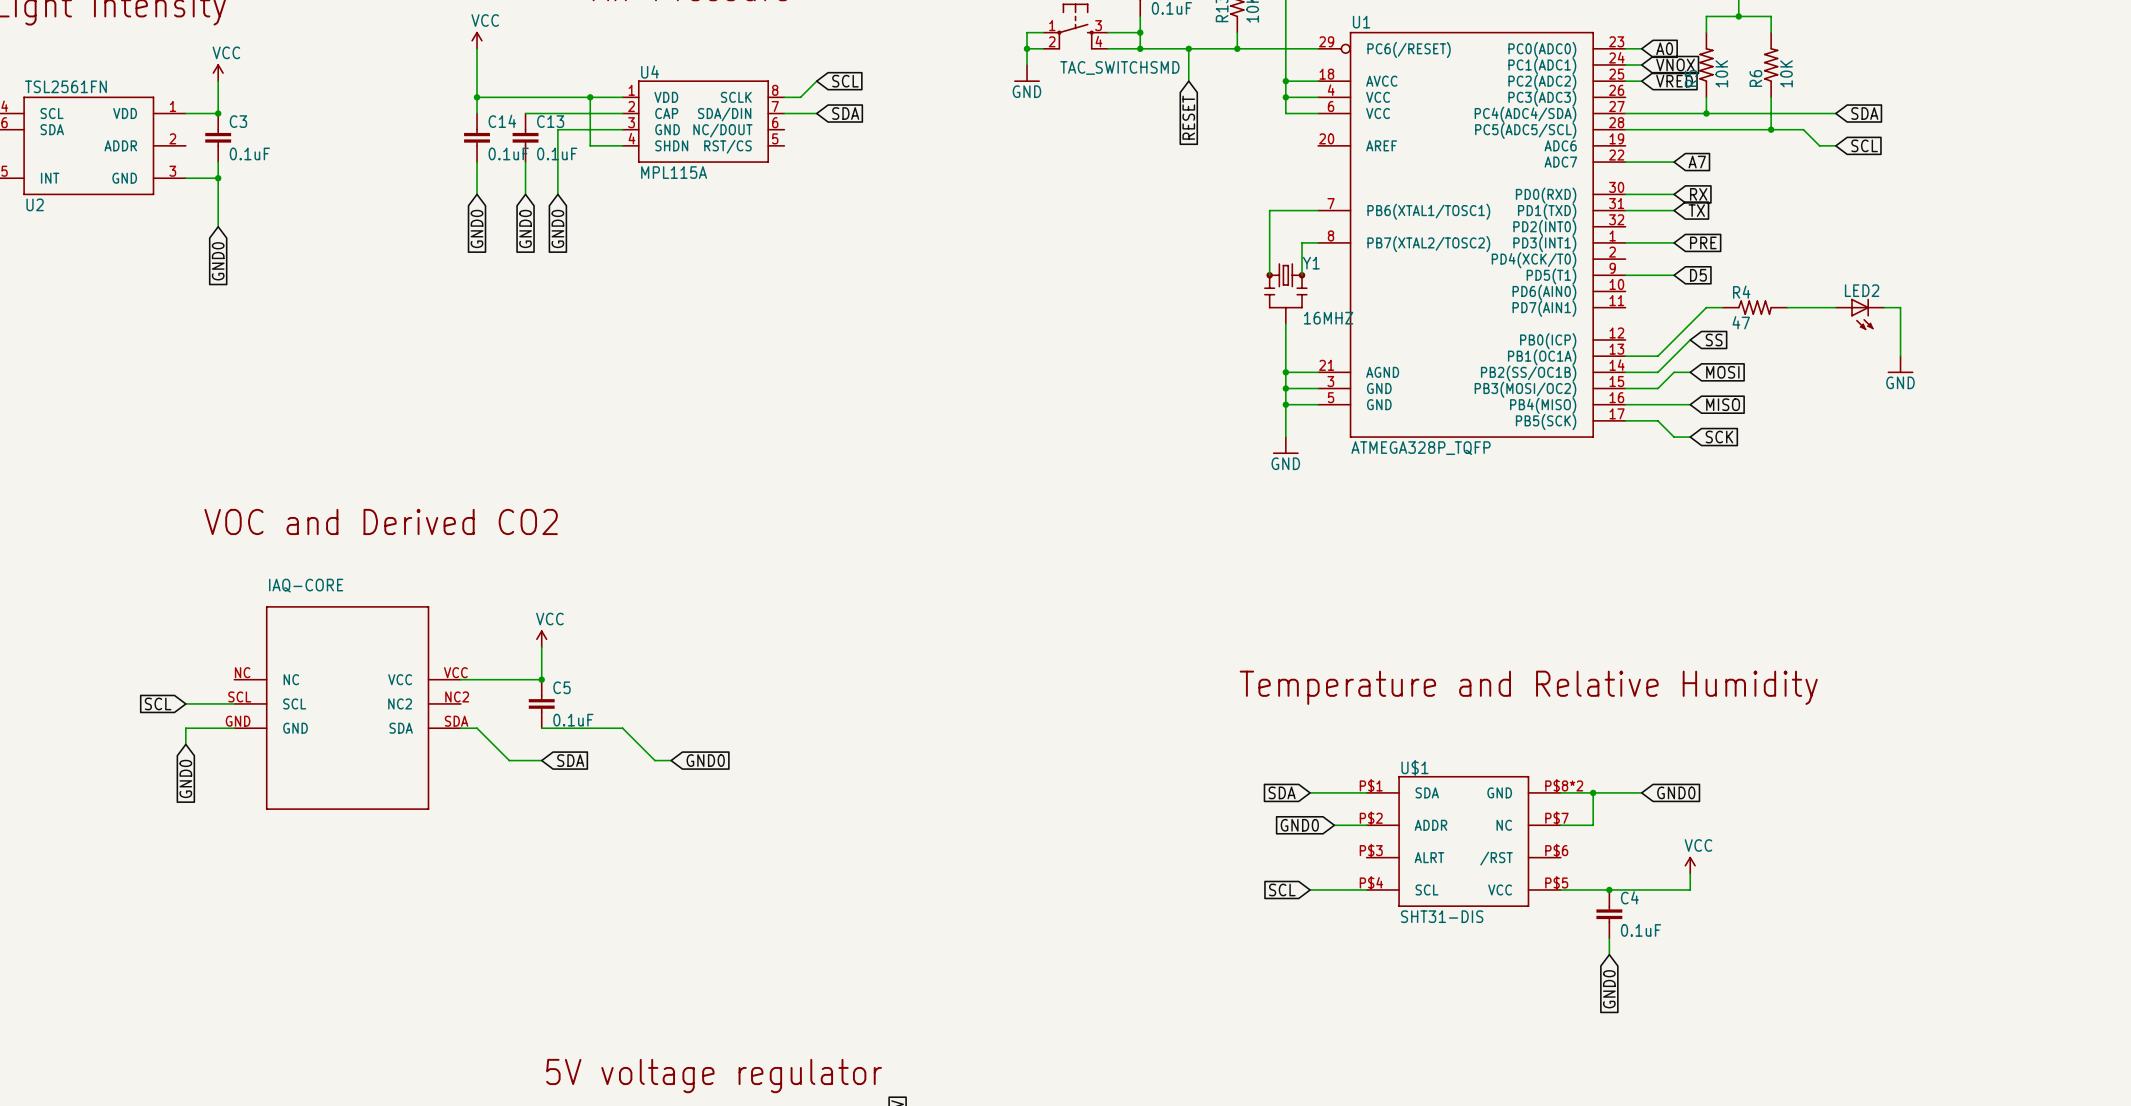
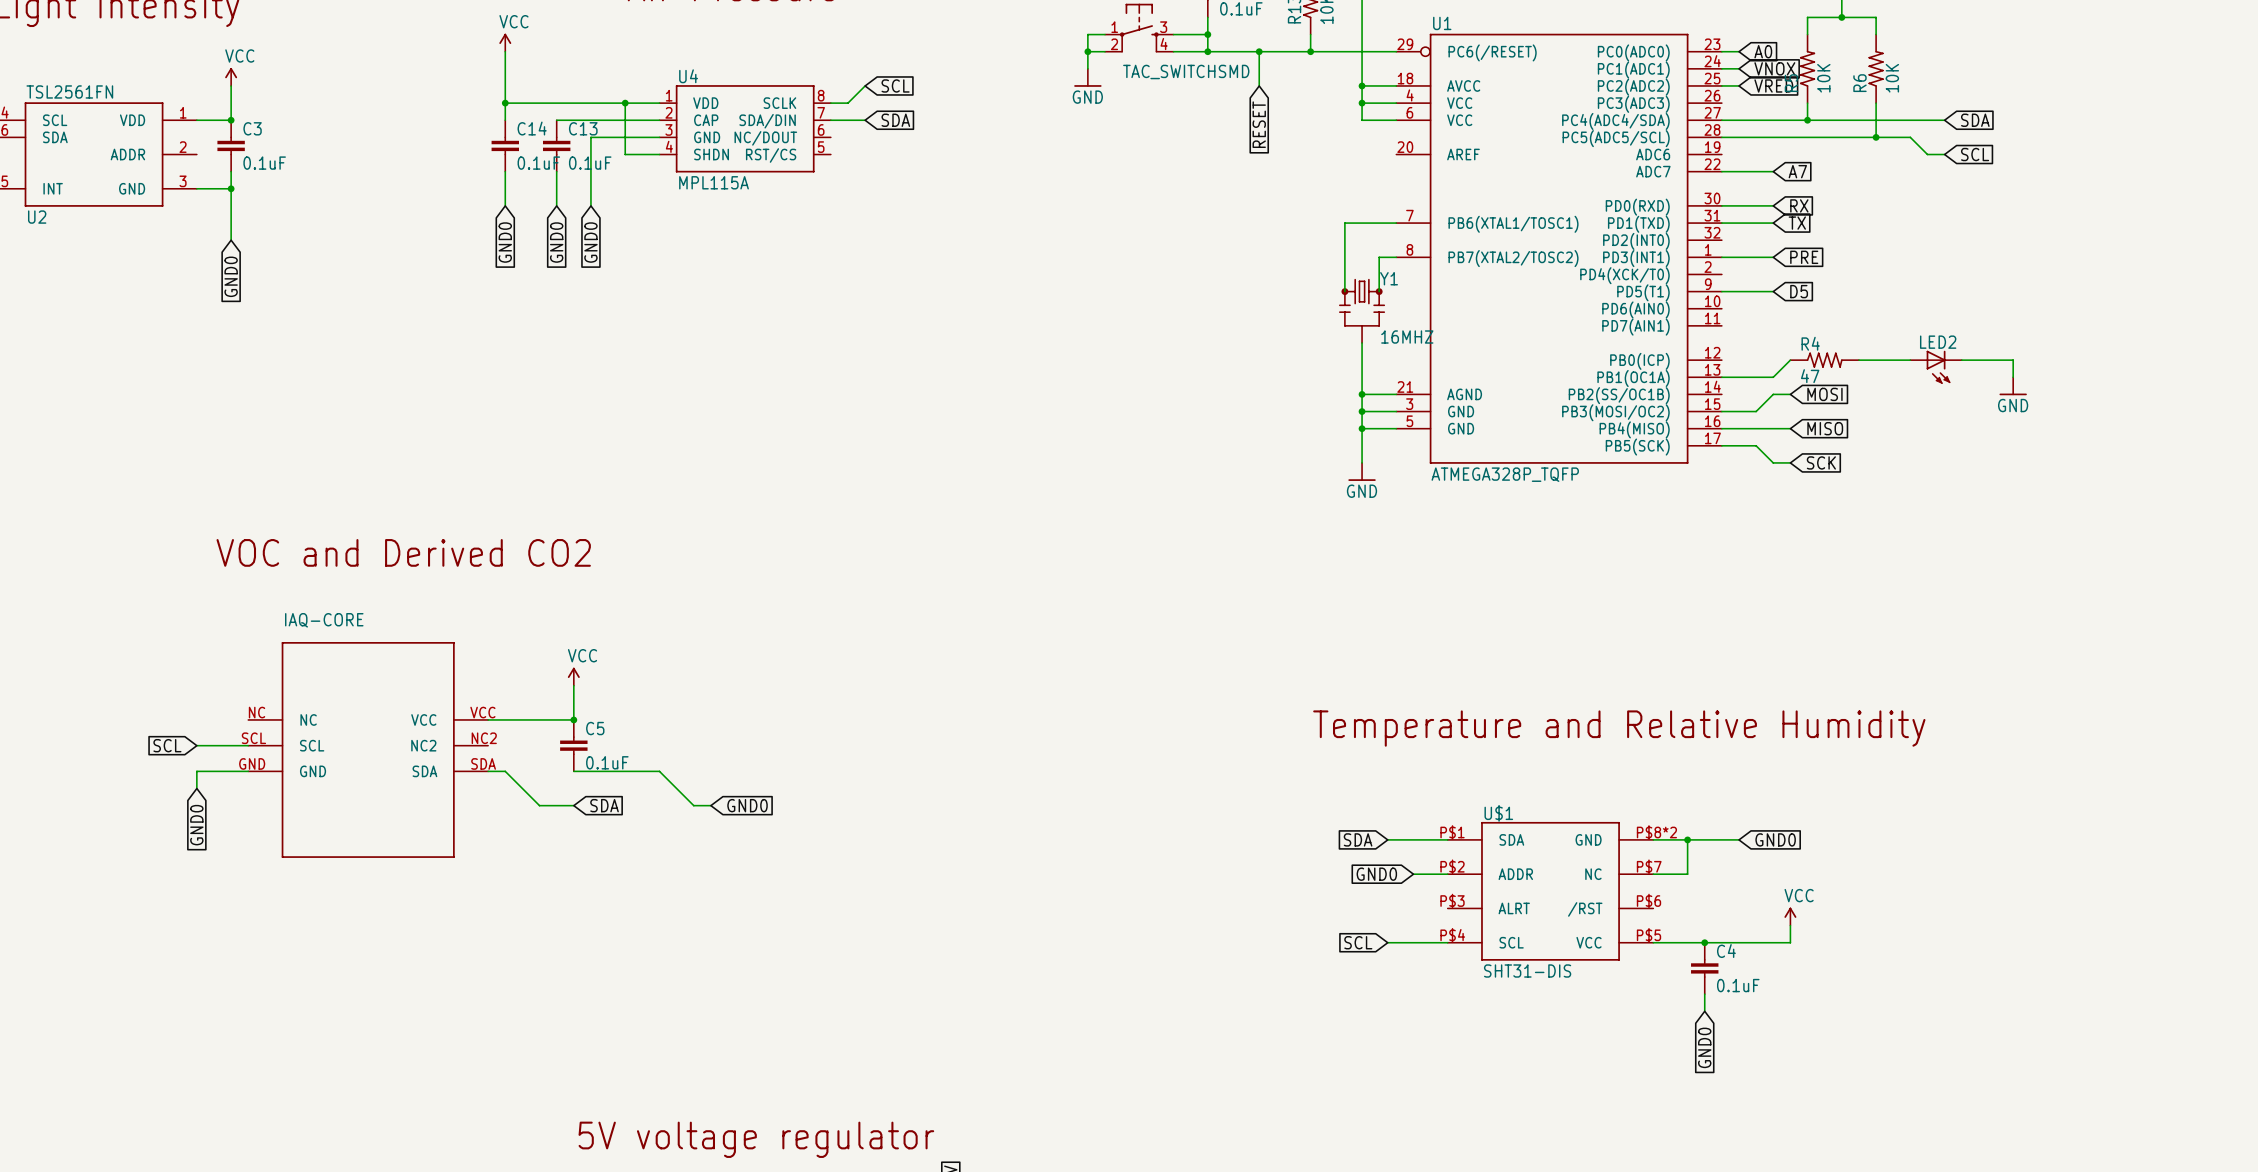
wire: (1722, 307) (1706, 307) (1657, 356) -> none
R4 position: (1754, 307) -> (1824, 360)
wire: (1787, 307) (1835, 307) -> (1858, 360) (1910, 360)
wire: (1884, 307) (1900, 307) (1900, 339) -> (1961, 360) (2013, 360)
LED2 position: (1860, 314) -> (1936, 367)
global label: SS (1714, 339) -> none
wire: (1674, 356) (1657, 372) (1625, 372) -> (1773, 377) (1756, 377)

